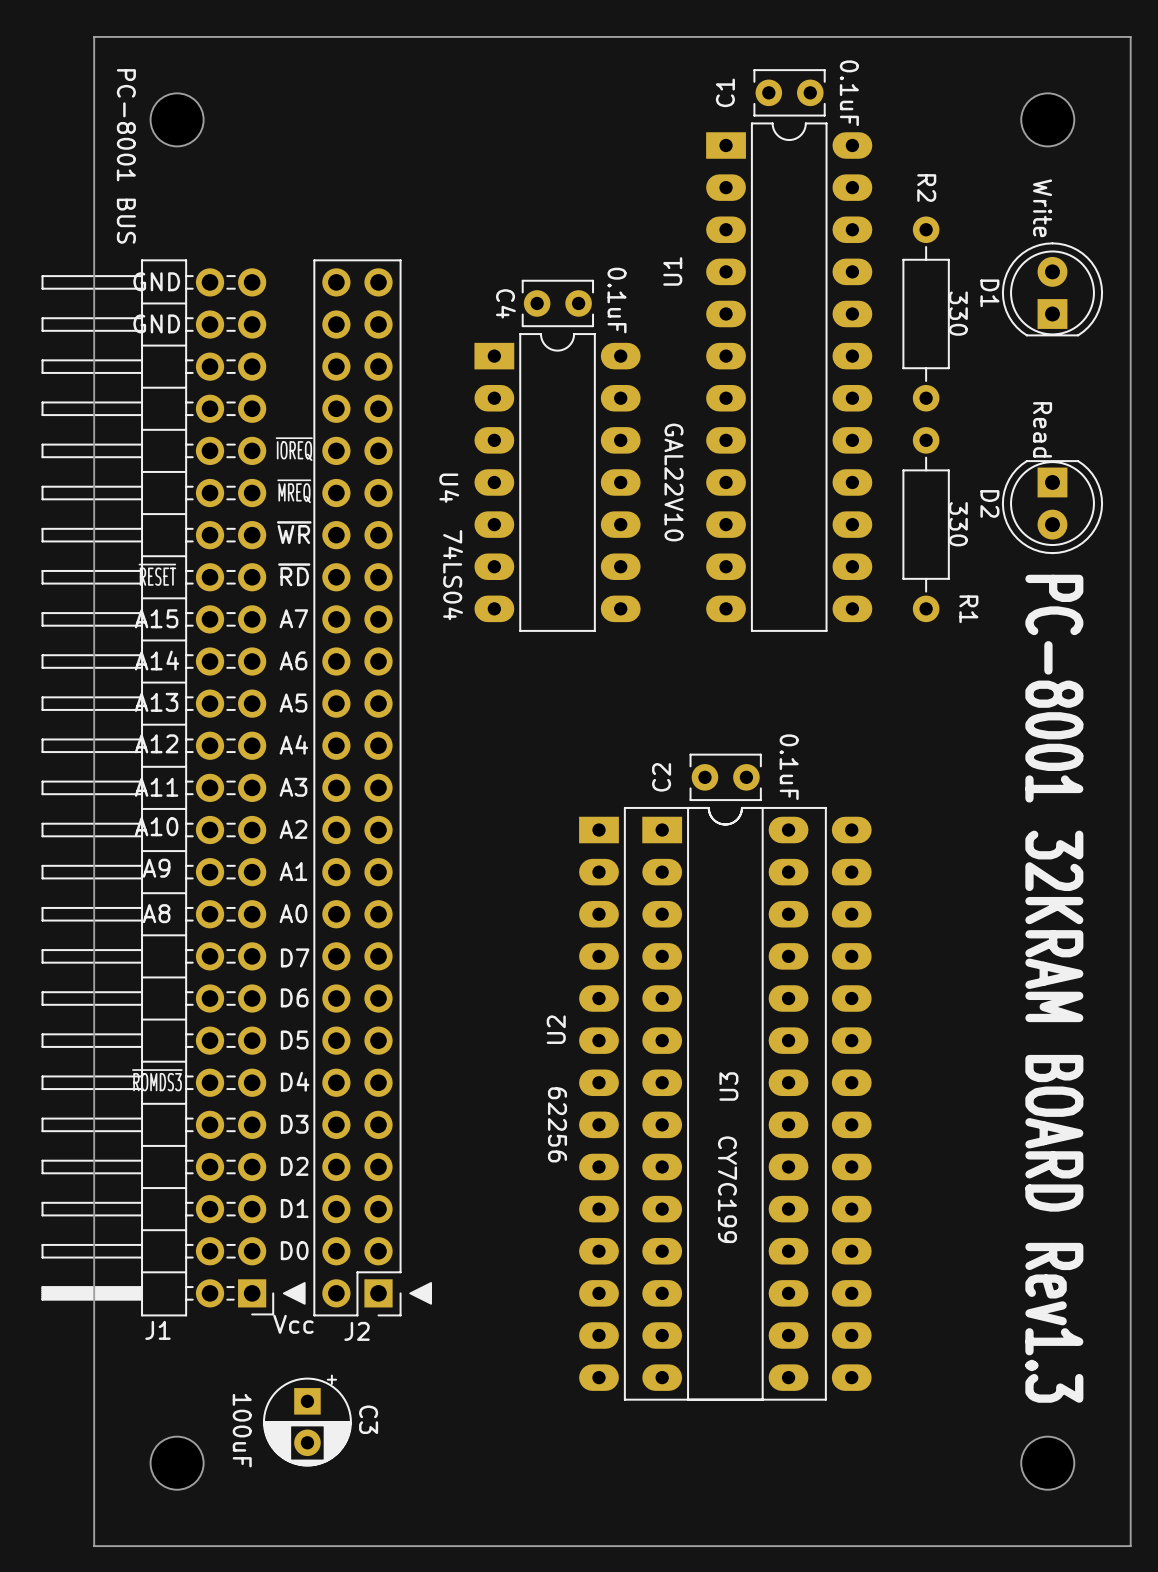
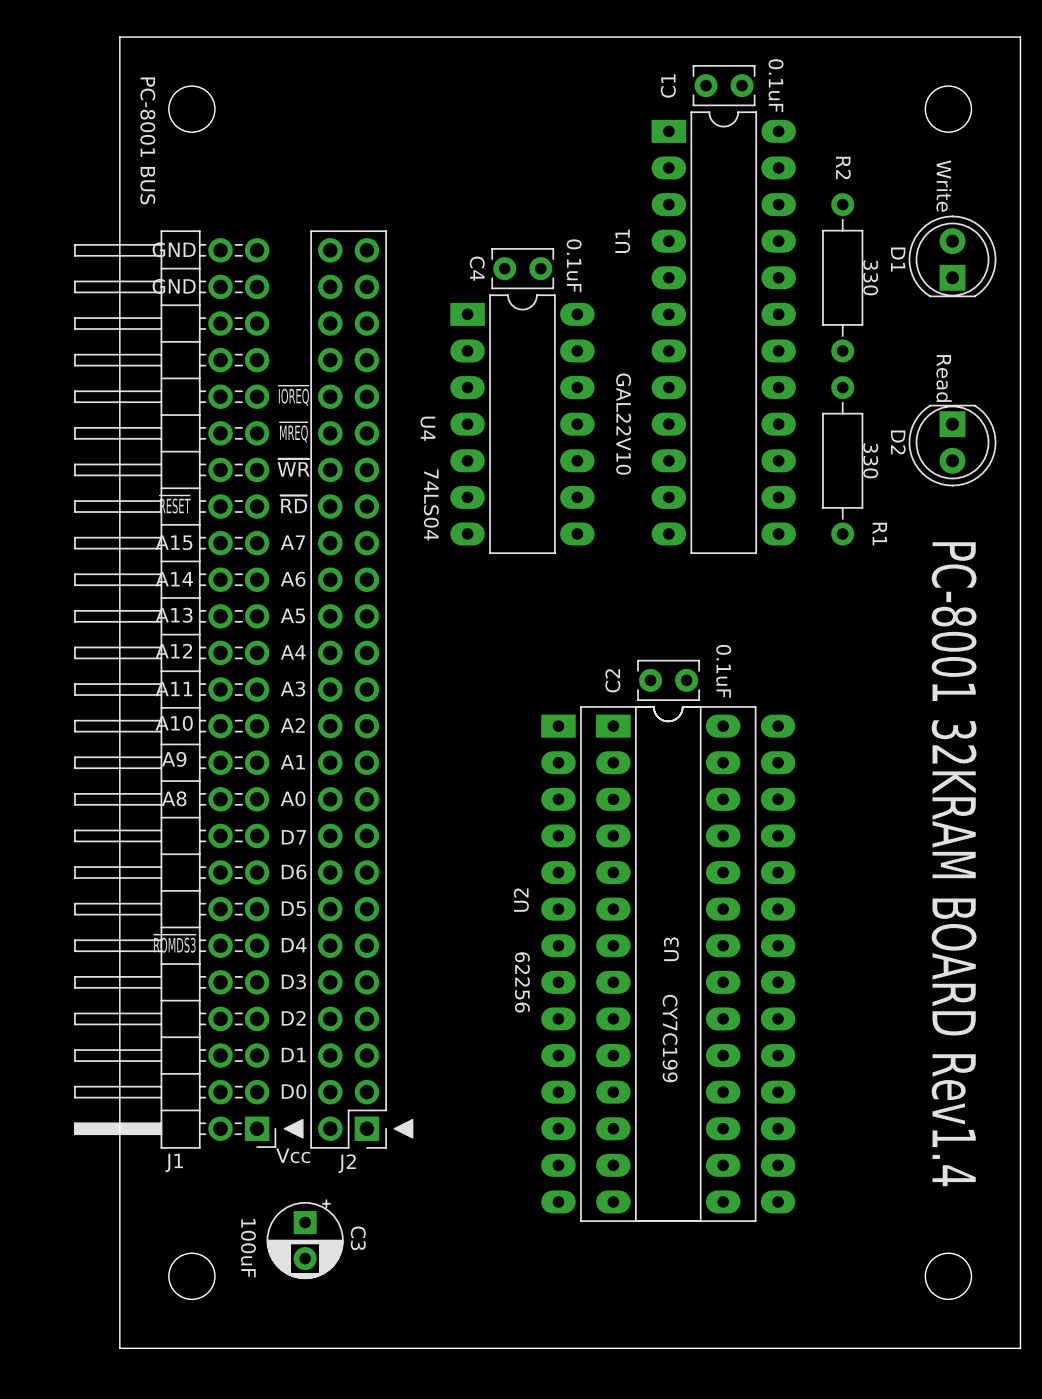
text: PC-8001 32KRAM BOARD Rev1.3 (1054, 988) -> PC-8001 32KRAM BOARD Rev1.4 (954, 864)

